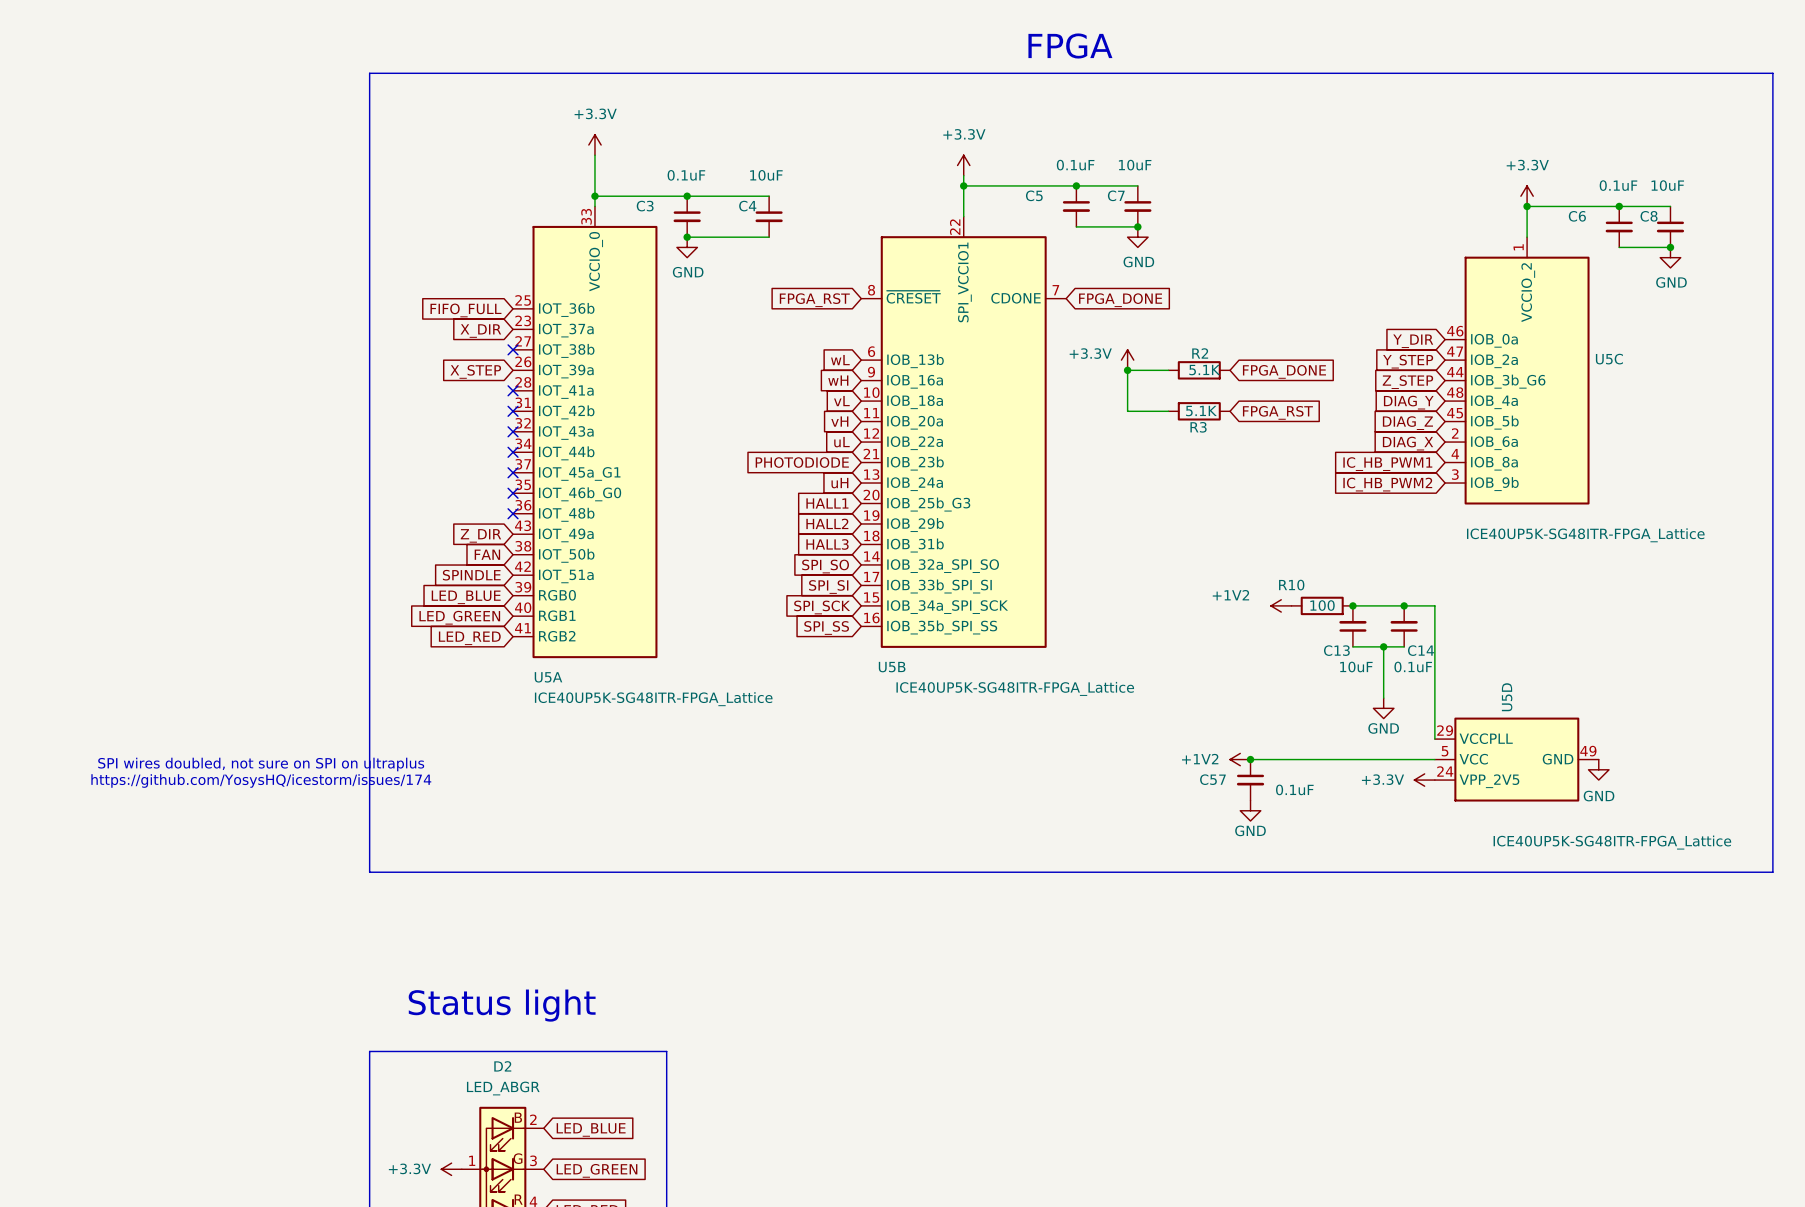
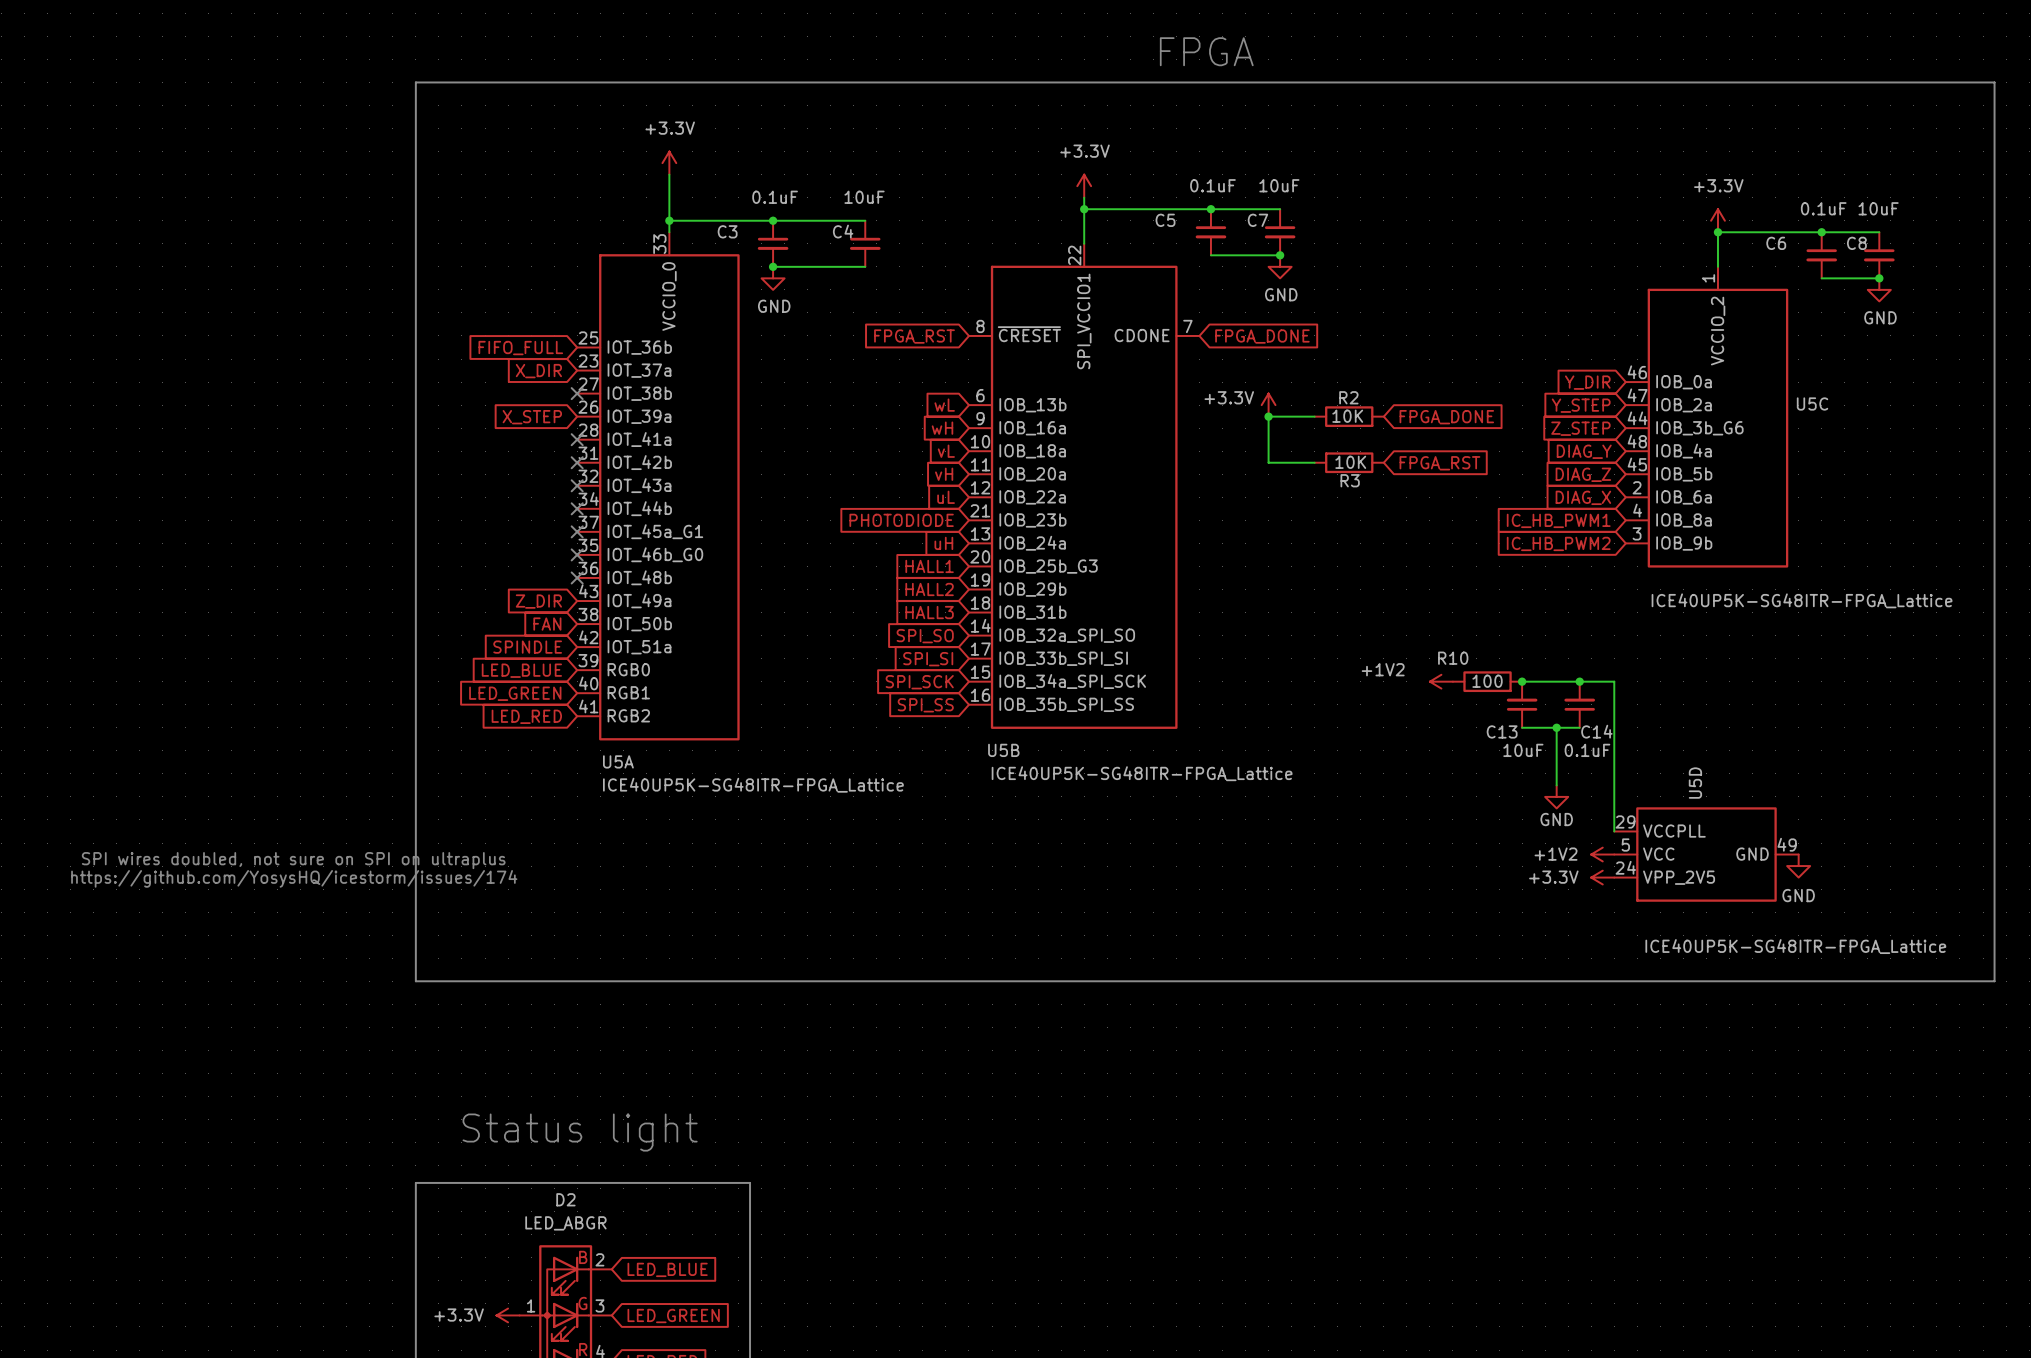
R2 value: 5.1K (1204, 370) -> 10K (1347, 416)
R3 value: 5.1K (1201, 411) -> 10K (1350, 462)
power symbol position: +1V2 (1240, 759) -> +1V2 (1602, 854)
wire: (1250, 759) (1434, 759) -> none
junction: (1250, 759) -> none
C57: 0.1uF (1250, 780) -> none
power symbol: GND (1250, 810) -> none

